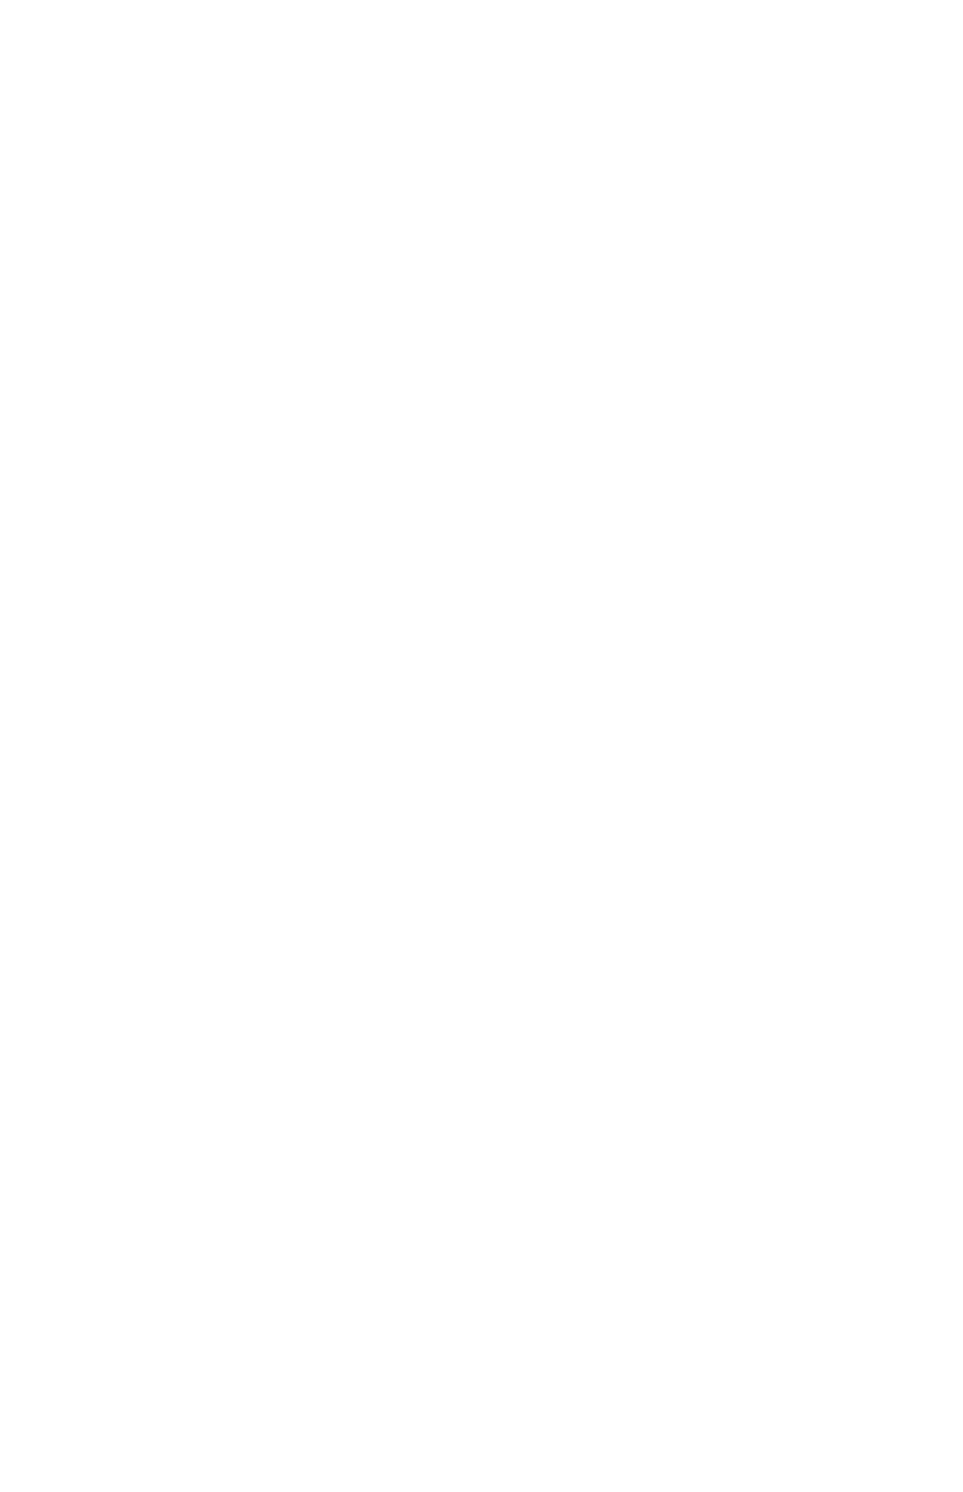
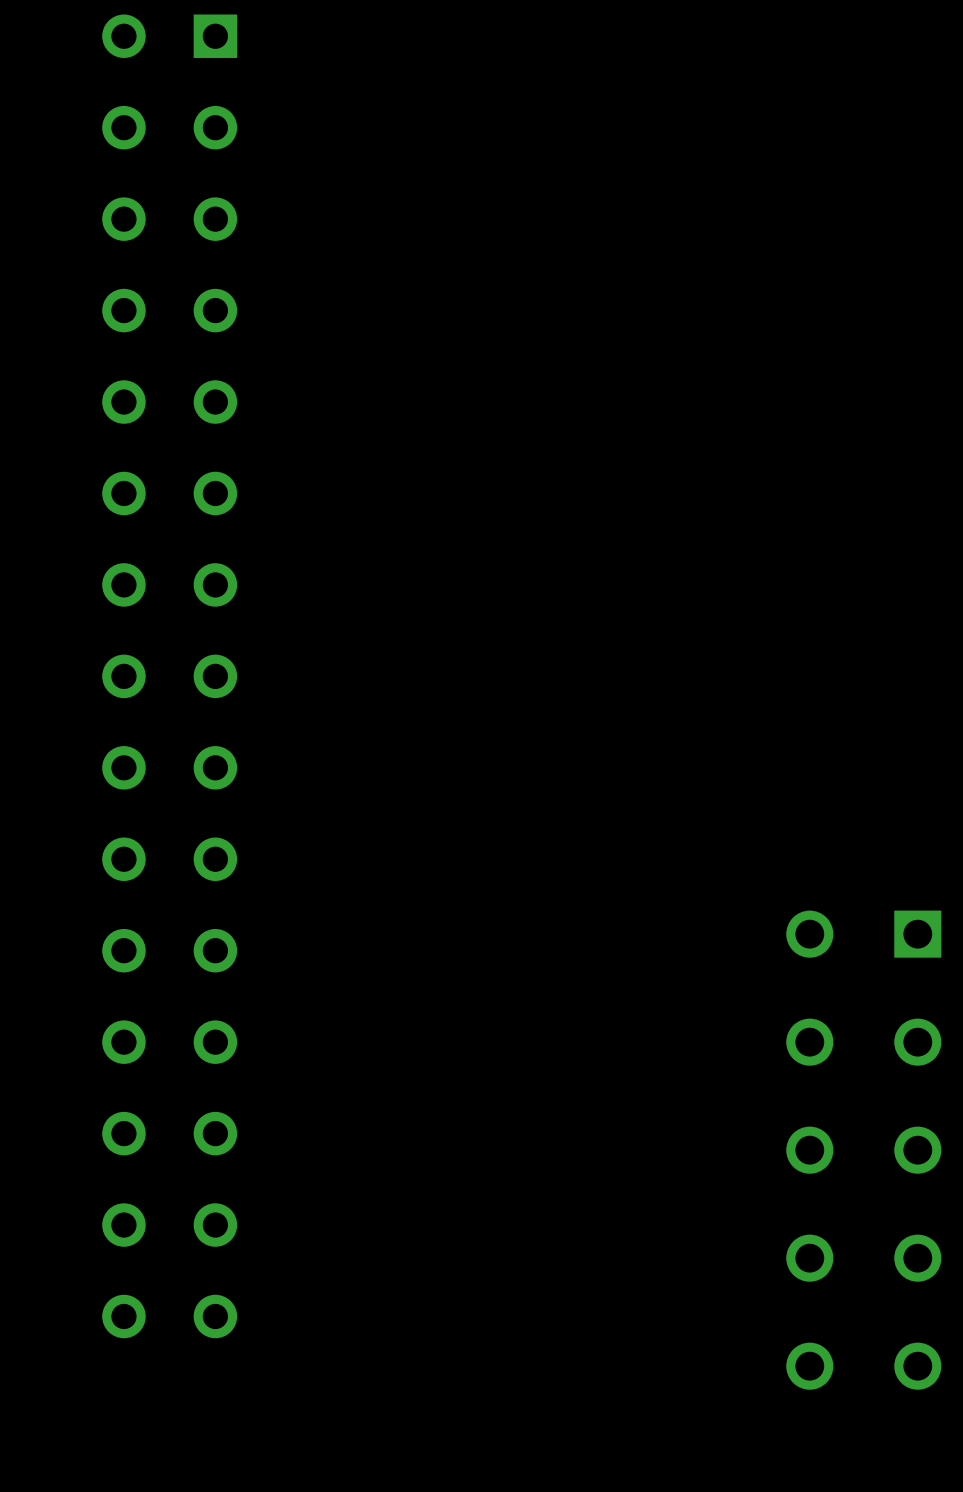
part: none -> (169, 676)
part: none -> (863, 1150)

